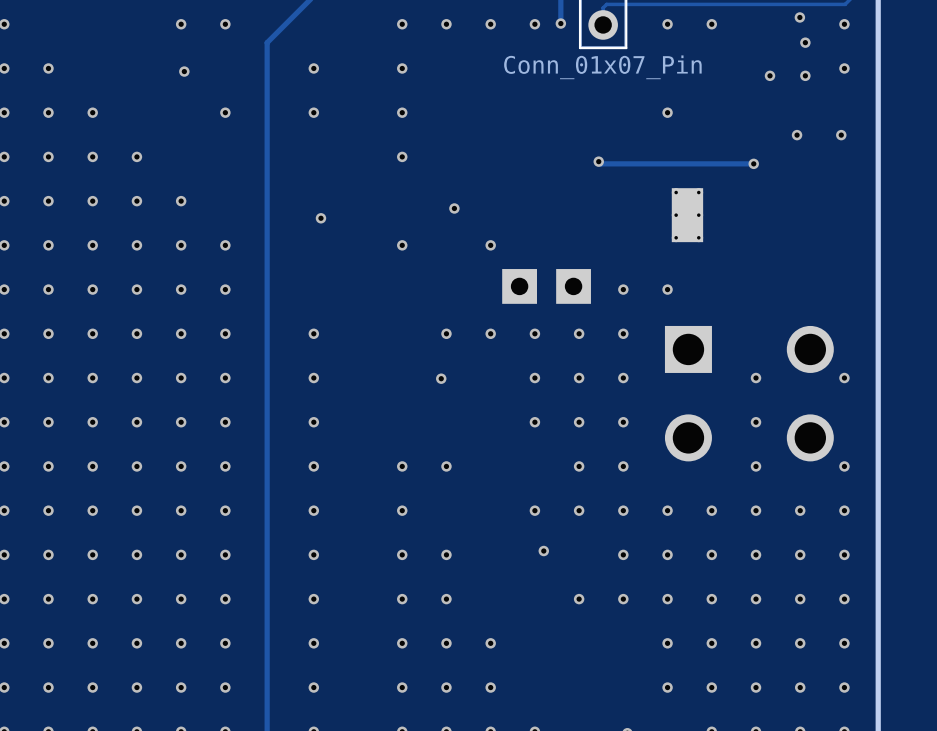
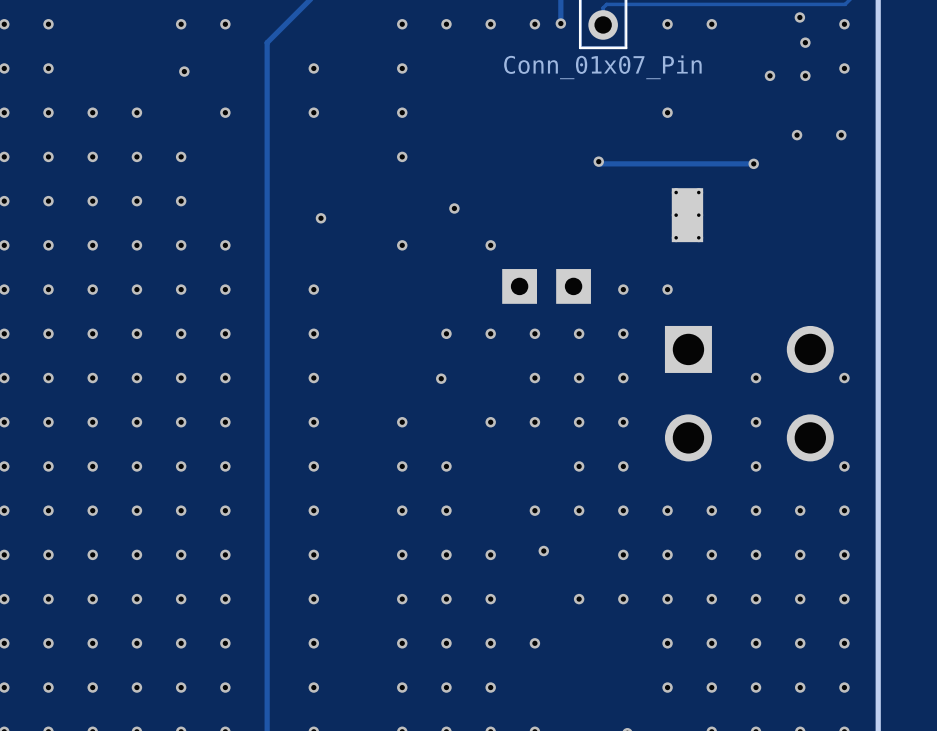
via: none -> (48, 24)
via: none -> (136, 112)
via: none -> (181, 156)
via: none -> (313, 289)
via: none -> (402, 422)
via: none -> (490, 422)
via: none -> (446, 510)
via: none -> (490, 554)
via: none -> (490, 599)
via: none -> (534, 643)

